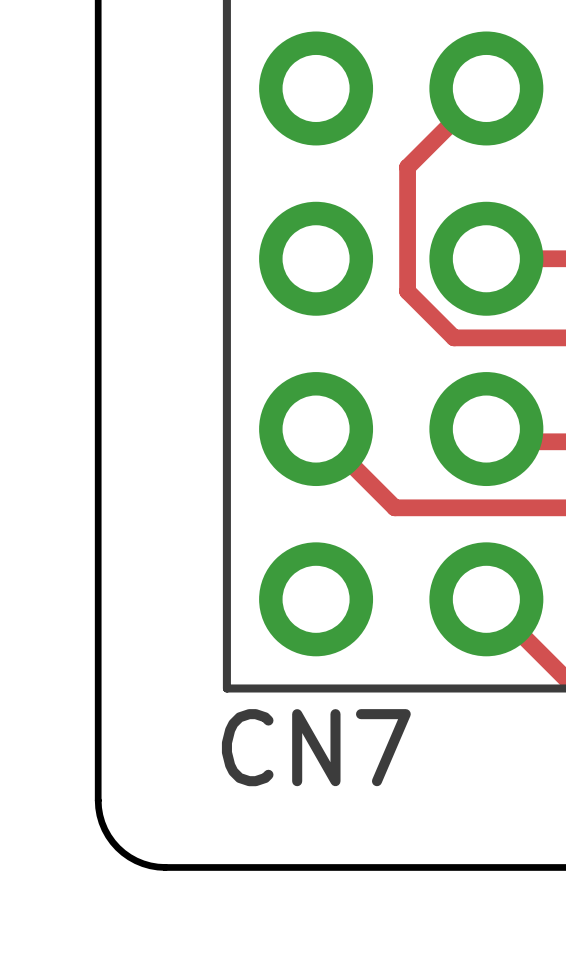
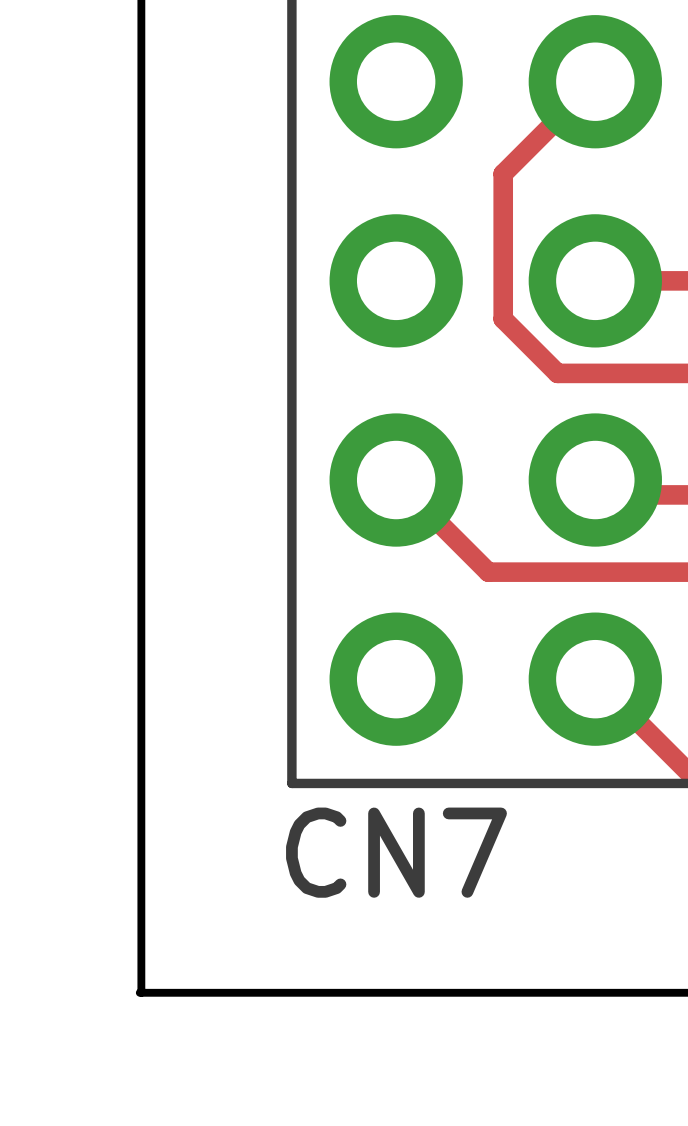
board edge: (98, 800) (99, 815) (104, 829) (117, 847) (136, 860) (150, 865) (165, 867) -> (141, 914) (141, 992)
board edge: none -> (139, 992) (219, 992)

